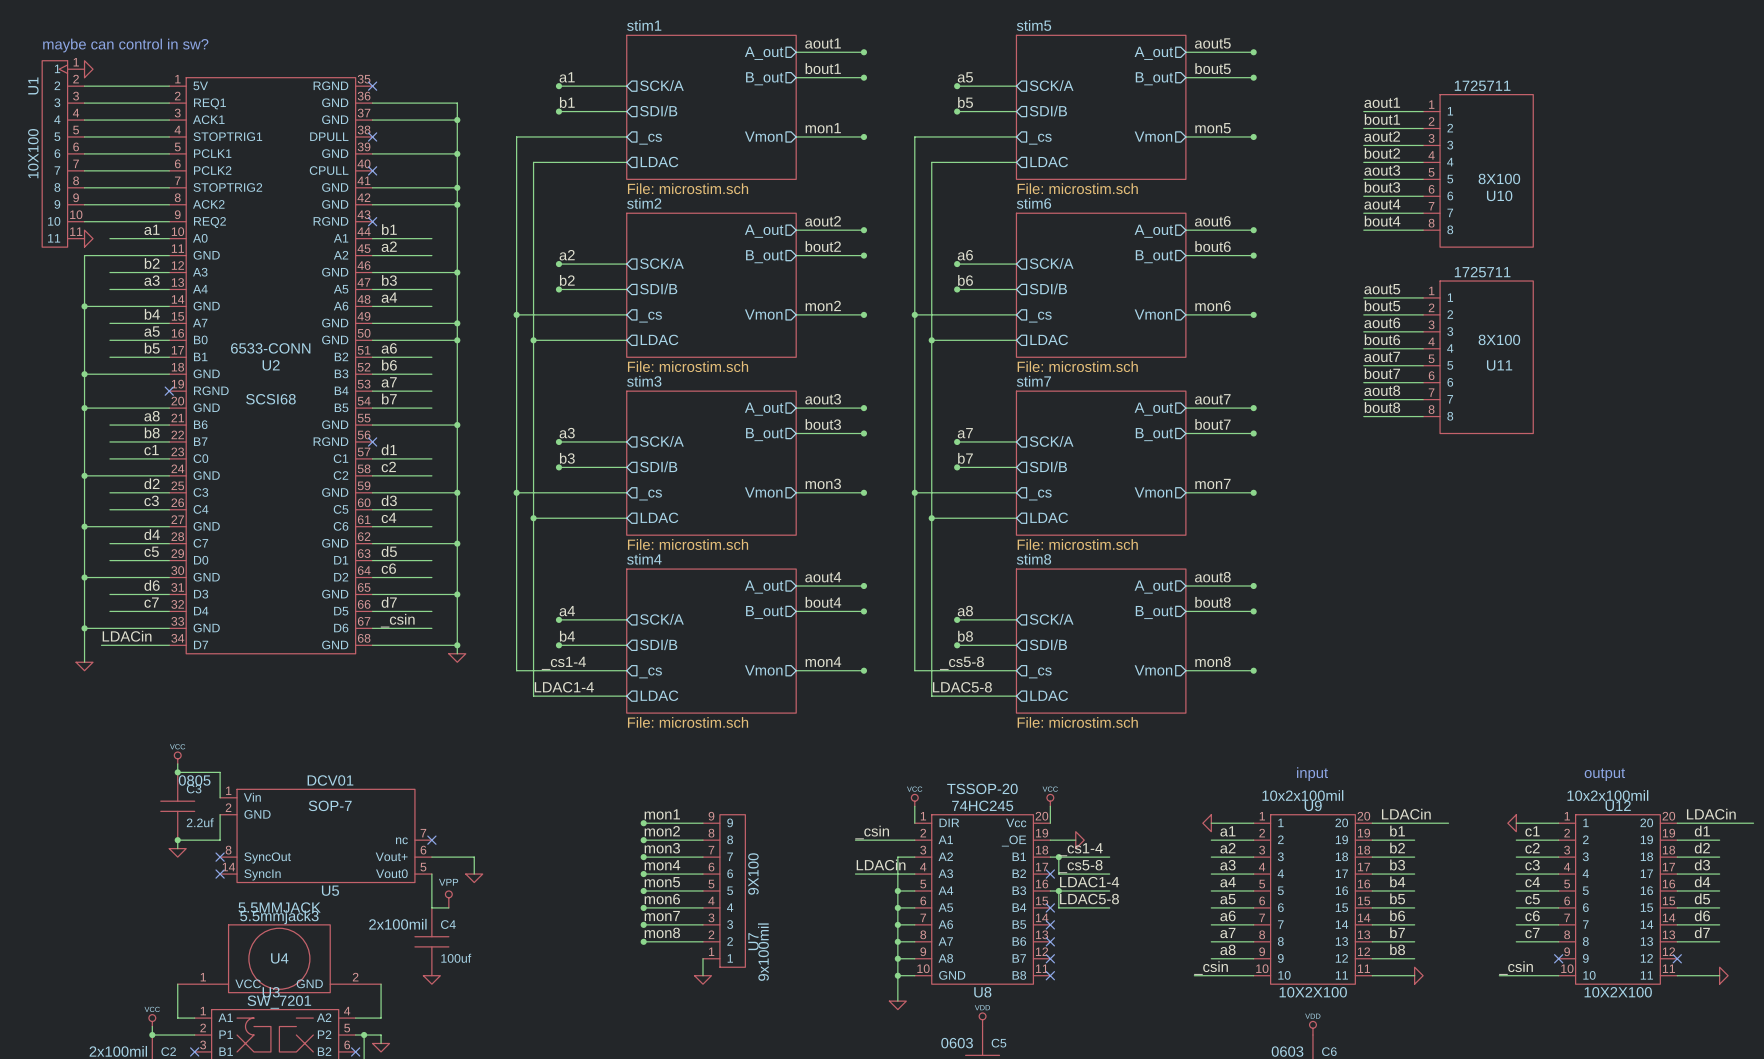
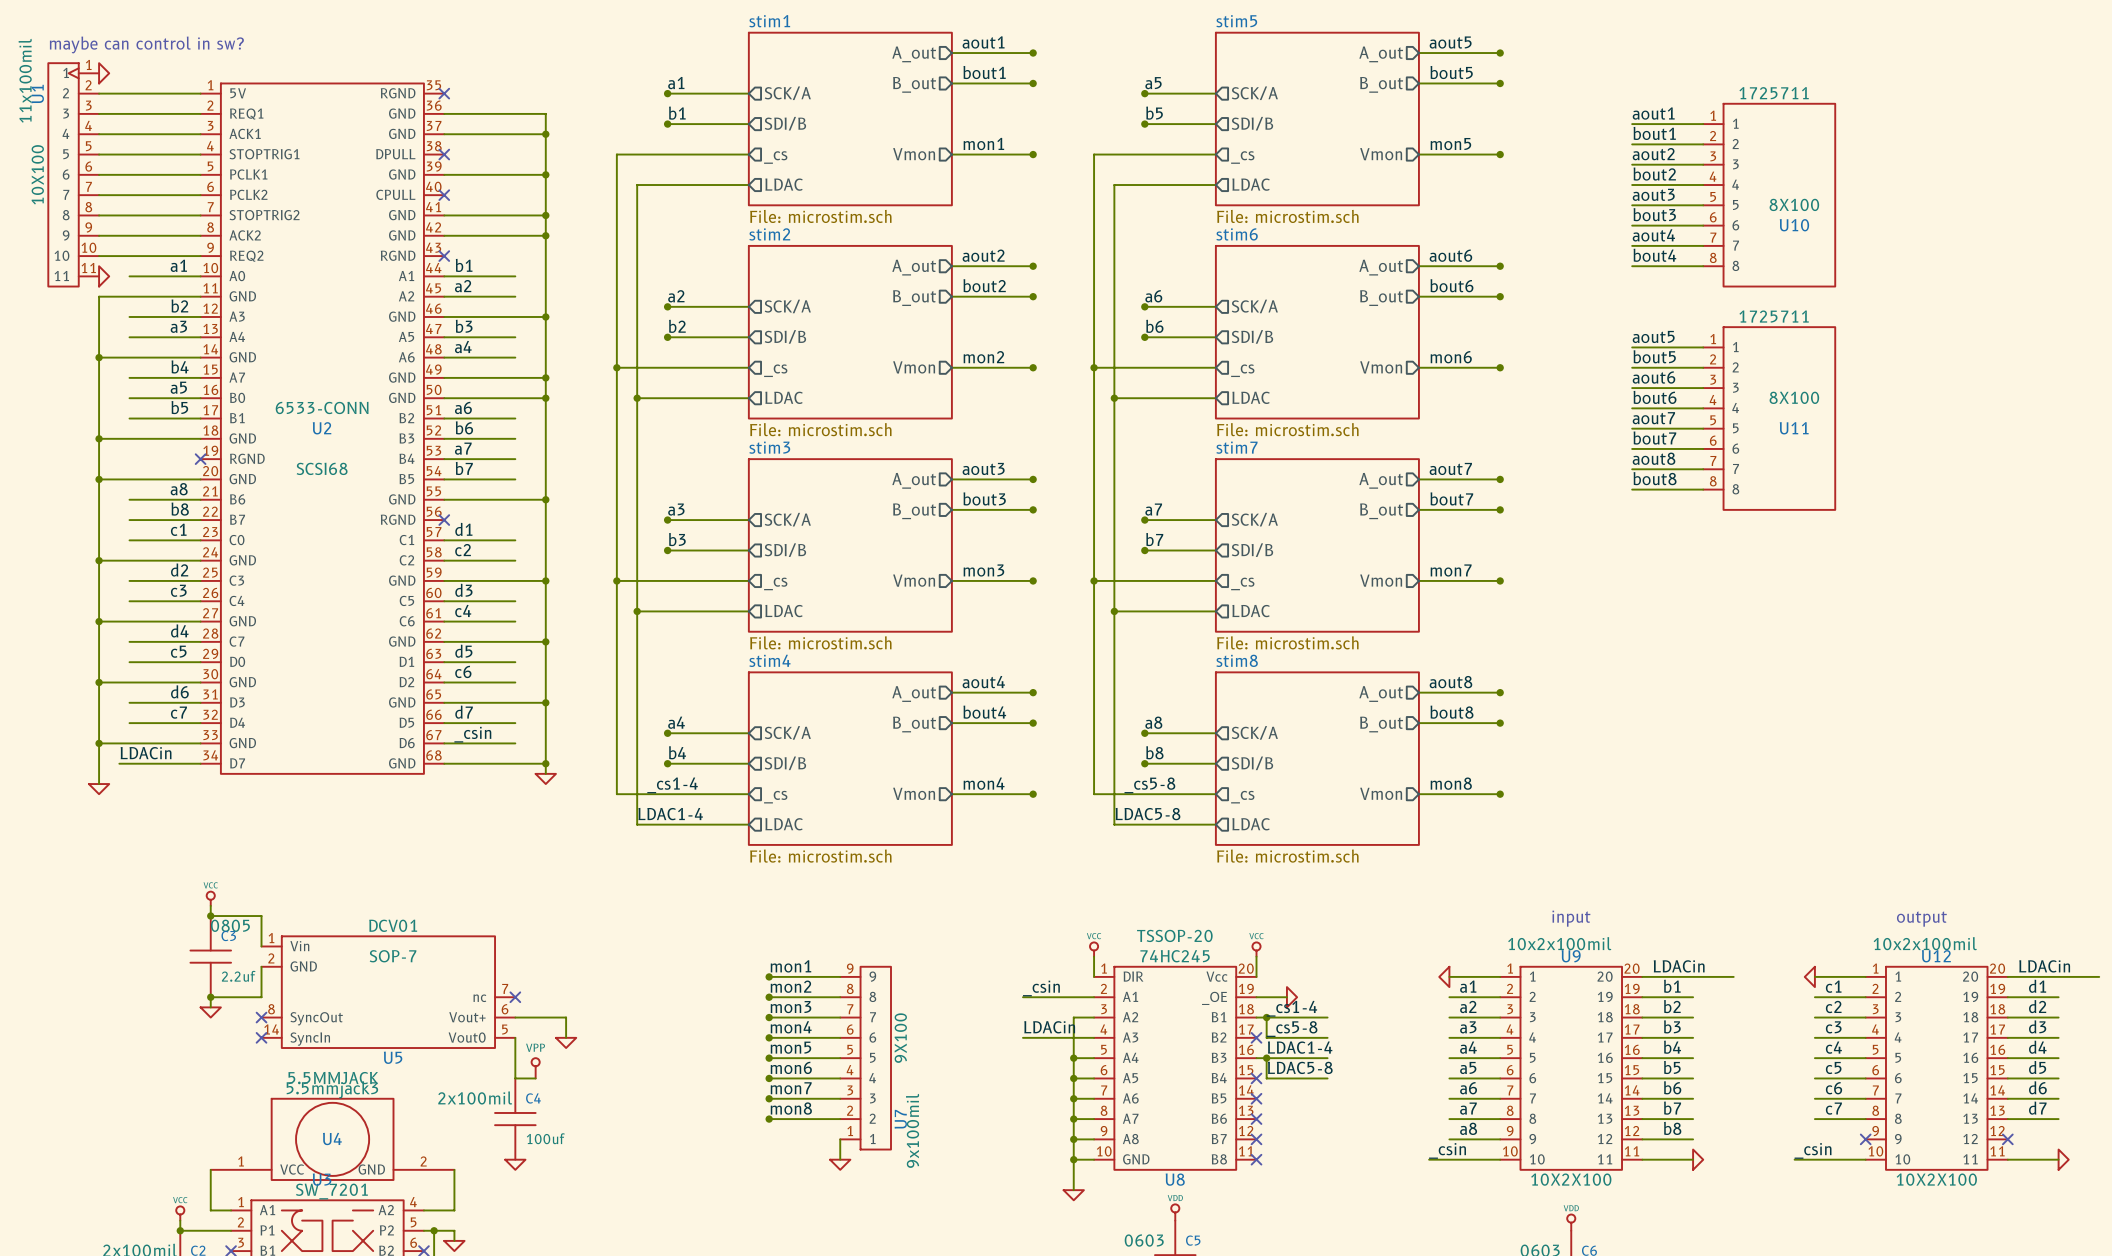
U1 text: none -> 11x100mil (25, 80)

